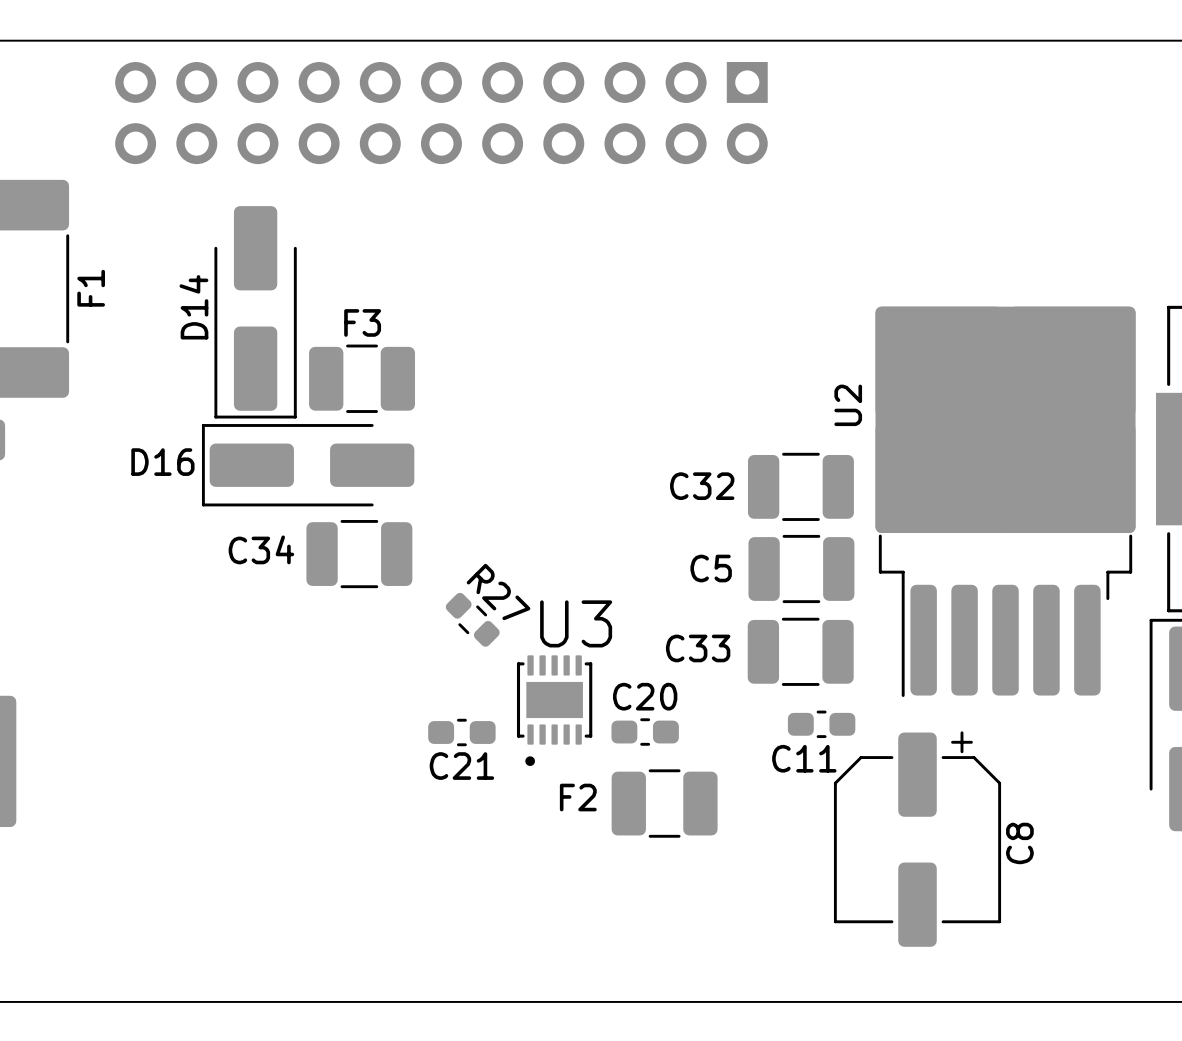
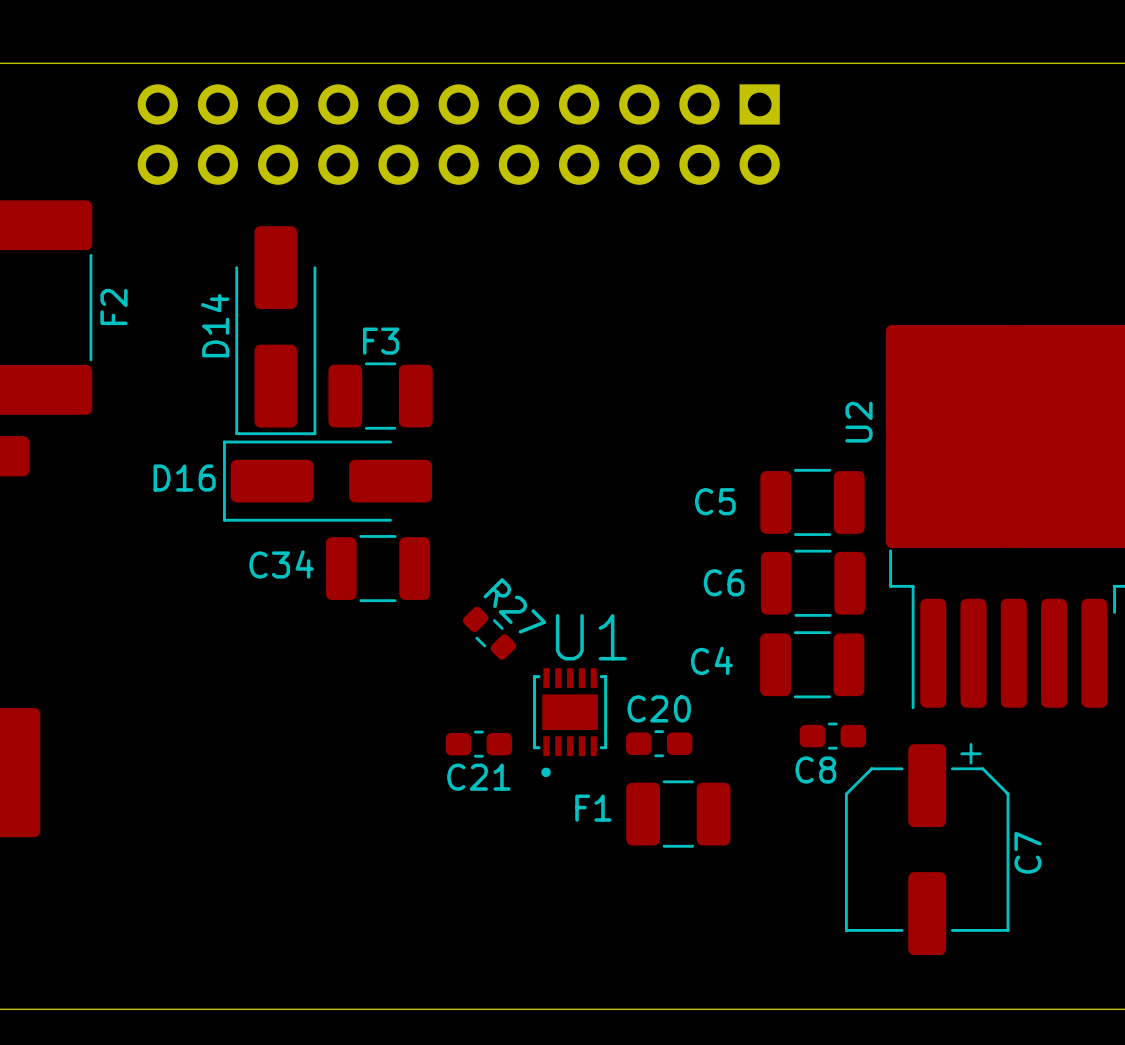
F1 name: F1 (91, 288) -> F2 (113, 306)
C32 name: C32 (702, 486) -> C5 (715, 501)
C5 name: C5 (711, 568) -> C6 (724, 582)
U3 name: U3 (576, 623) -> U1 (591, 637)
C33 name: C33 (698, 648) -> C4 (711, 660)
C11 name: C11 (804, 758) -> C8 (815, 769)
F2 name: F2 (578, 797) -> F1 (593, 808)
C8 name: C8 (1019, 843) -> C7 (1027, 852)

